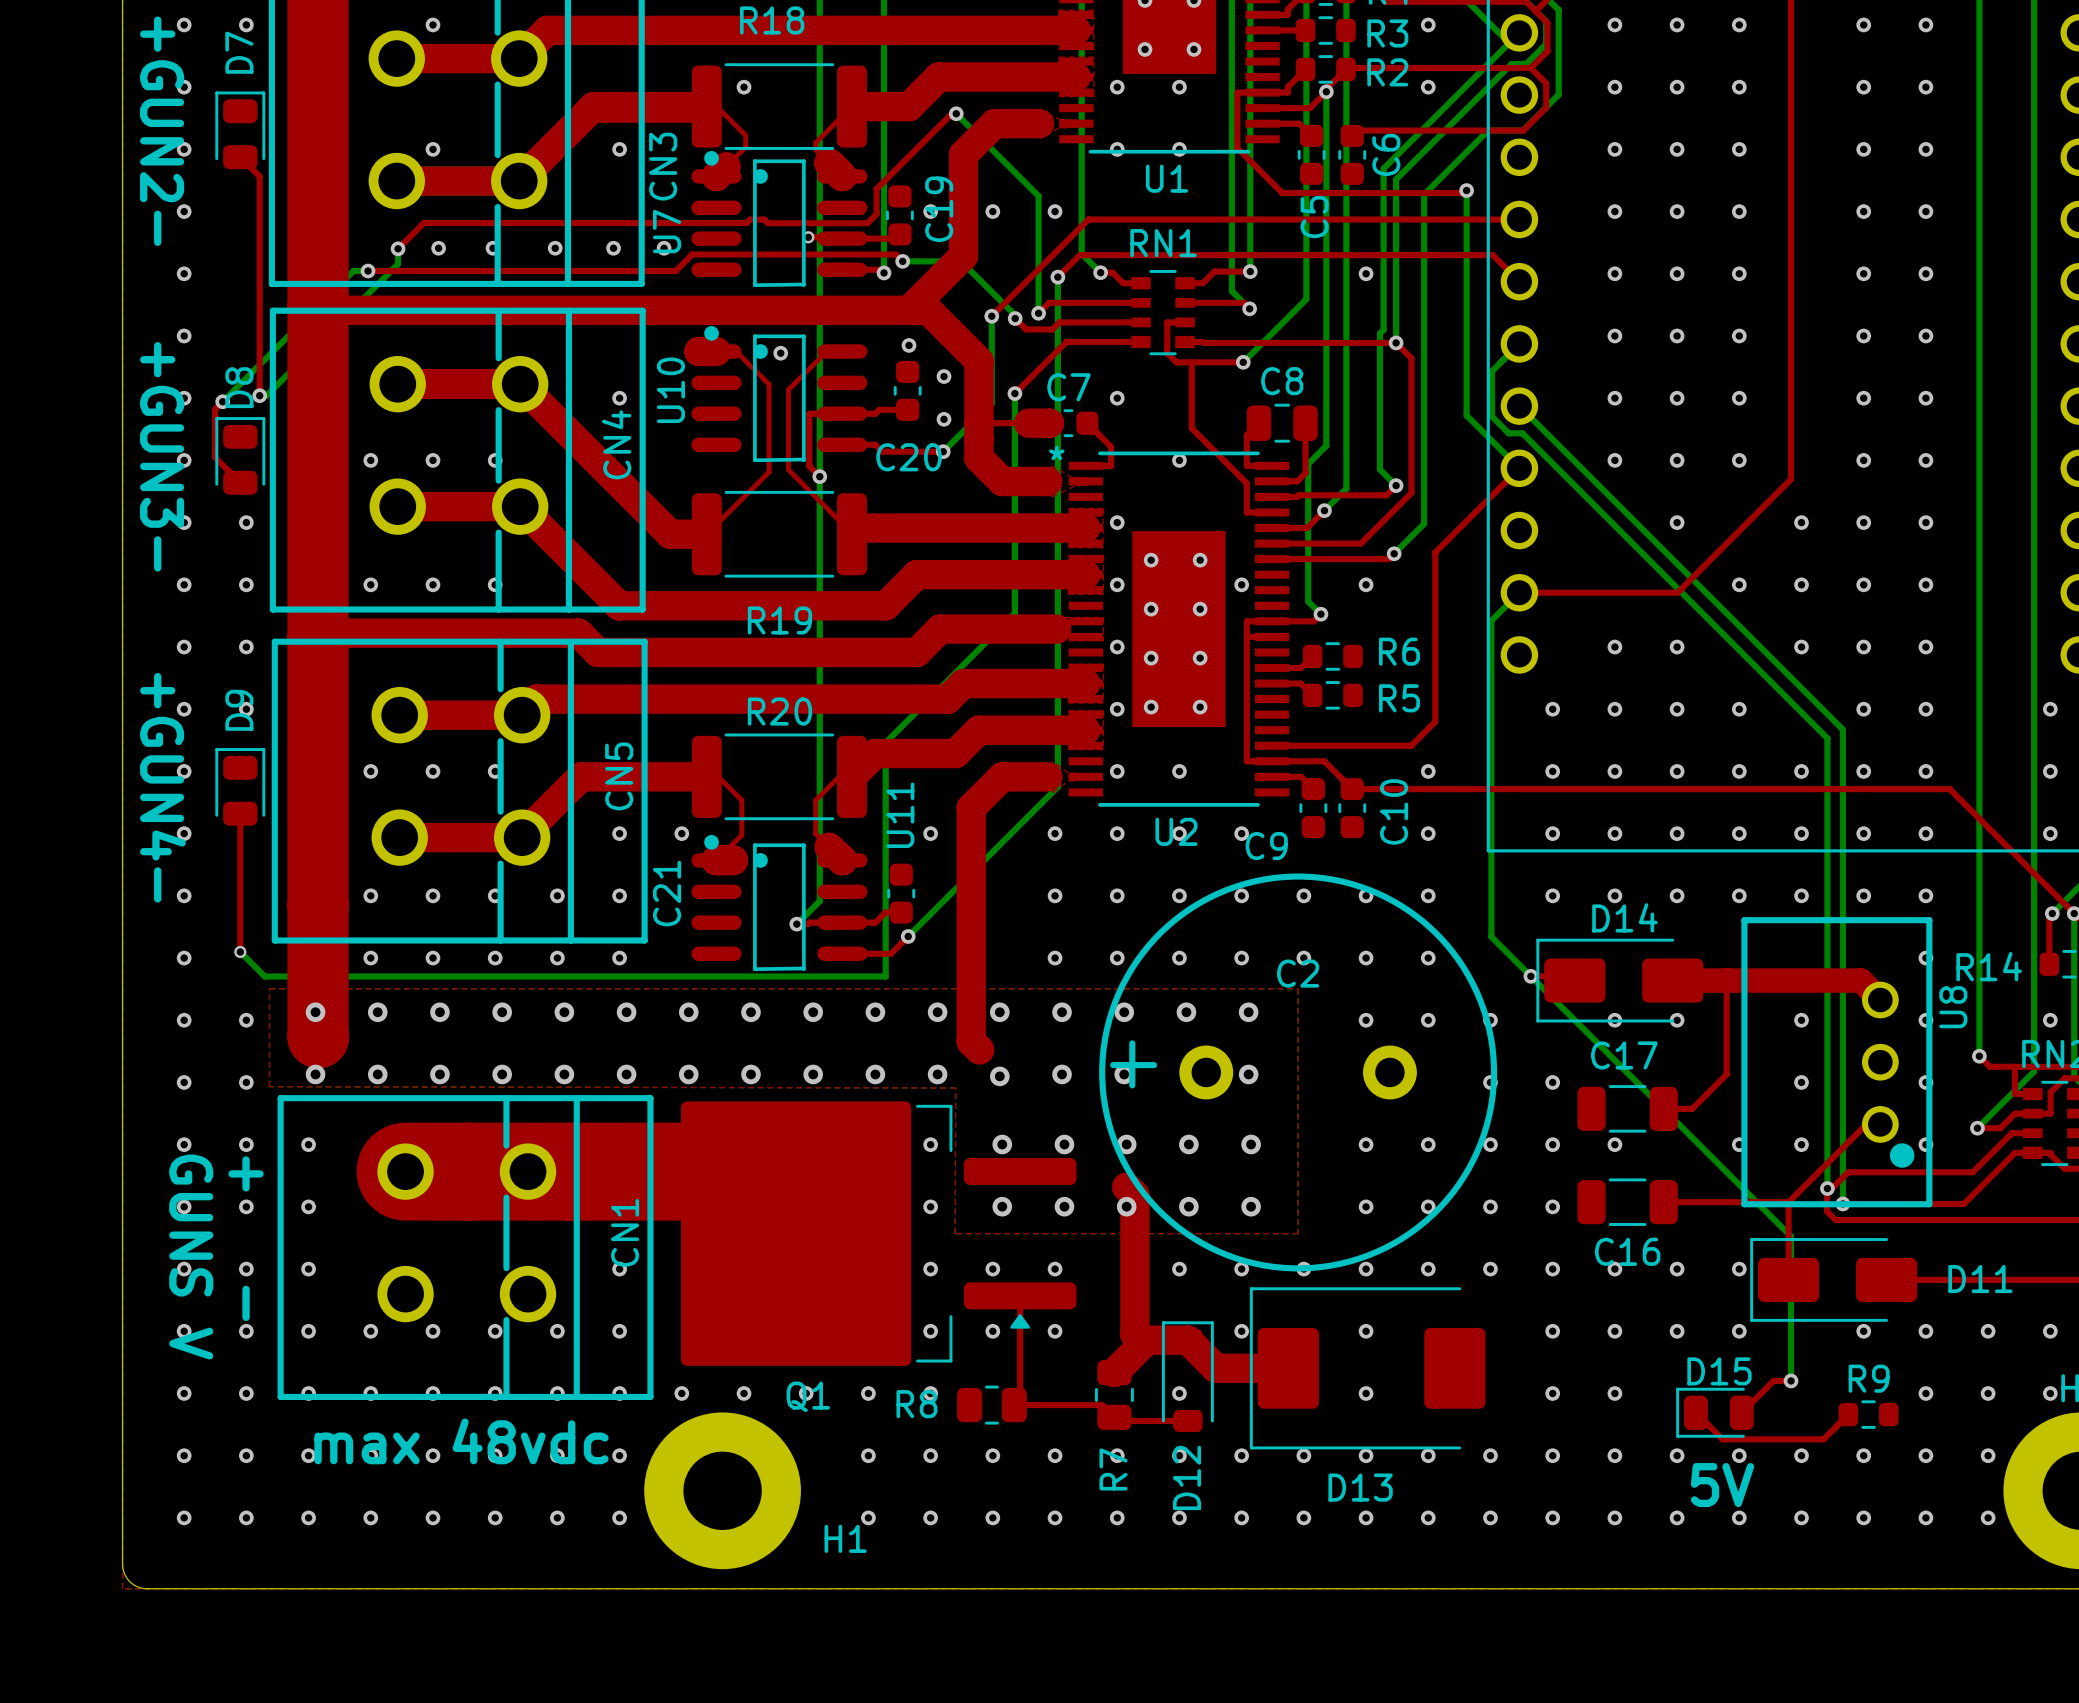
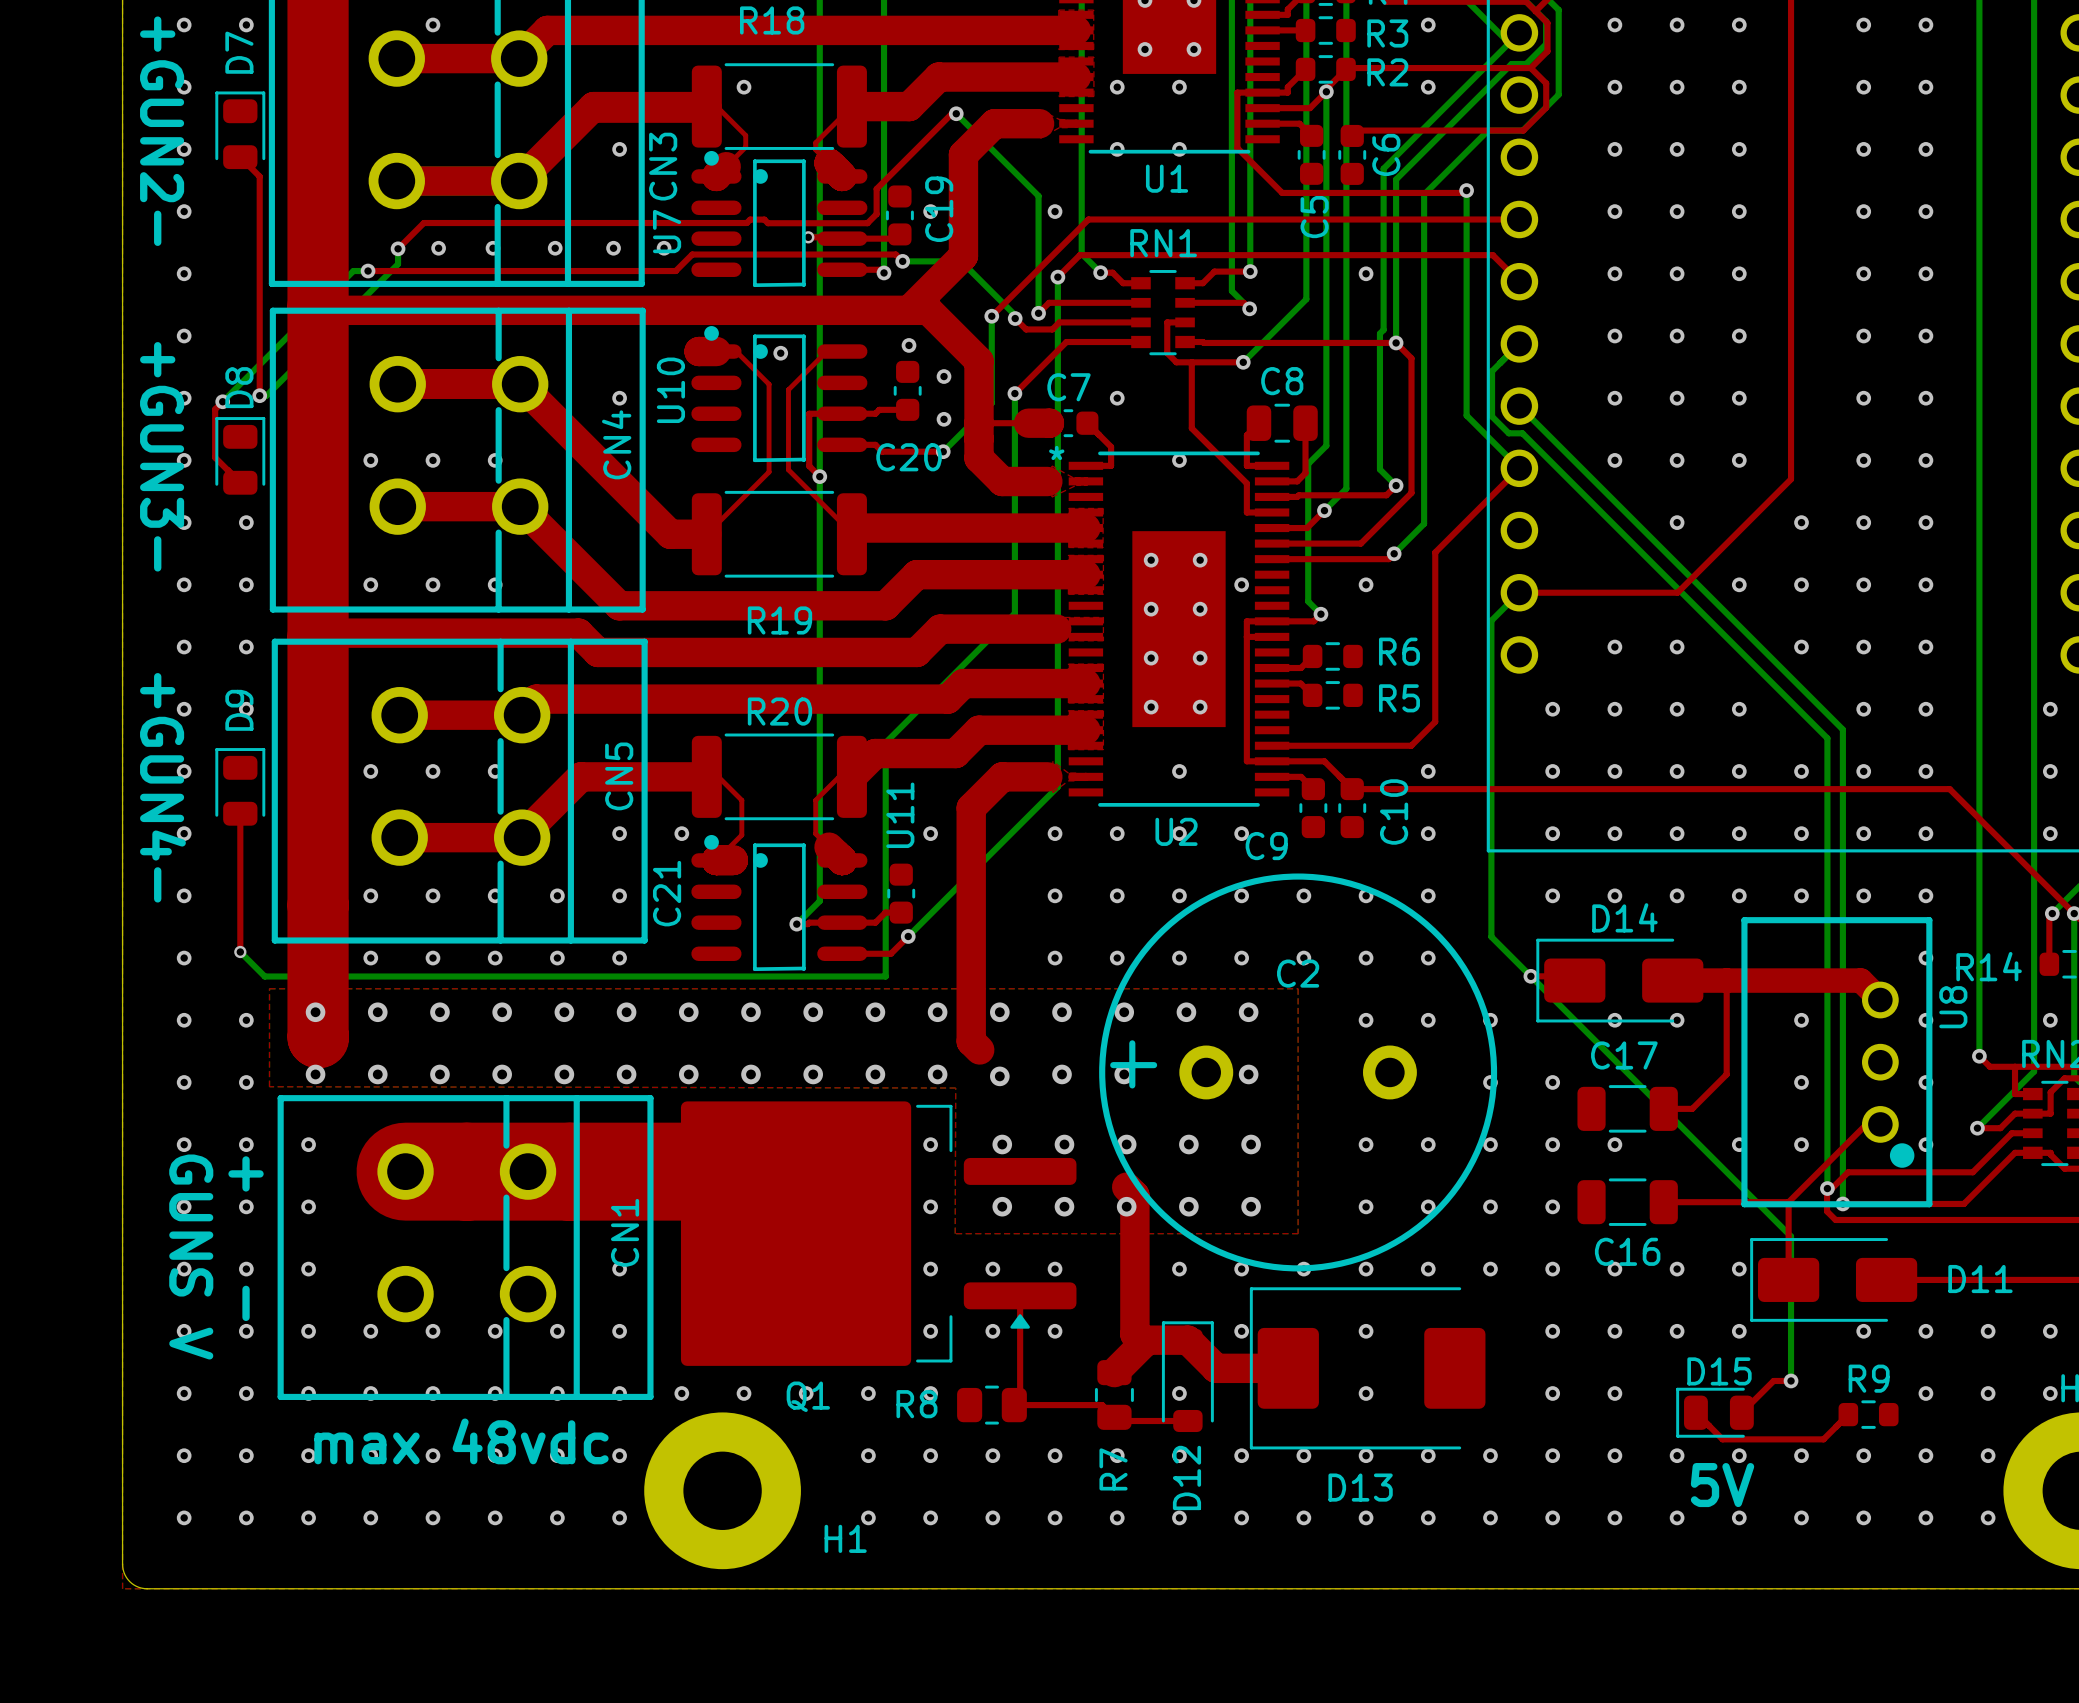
via: (432, 149) -> none
via: (992, 211) -> none
via: (1117, 522) -> none
via: (1117, 584) -> none
via: (1117, 647) -> none
via: (1117, 709) -> none
via: (1117, 771) -> none

